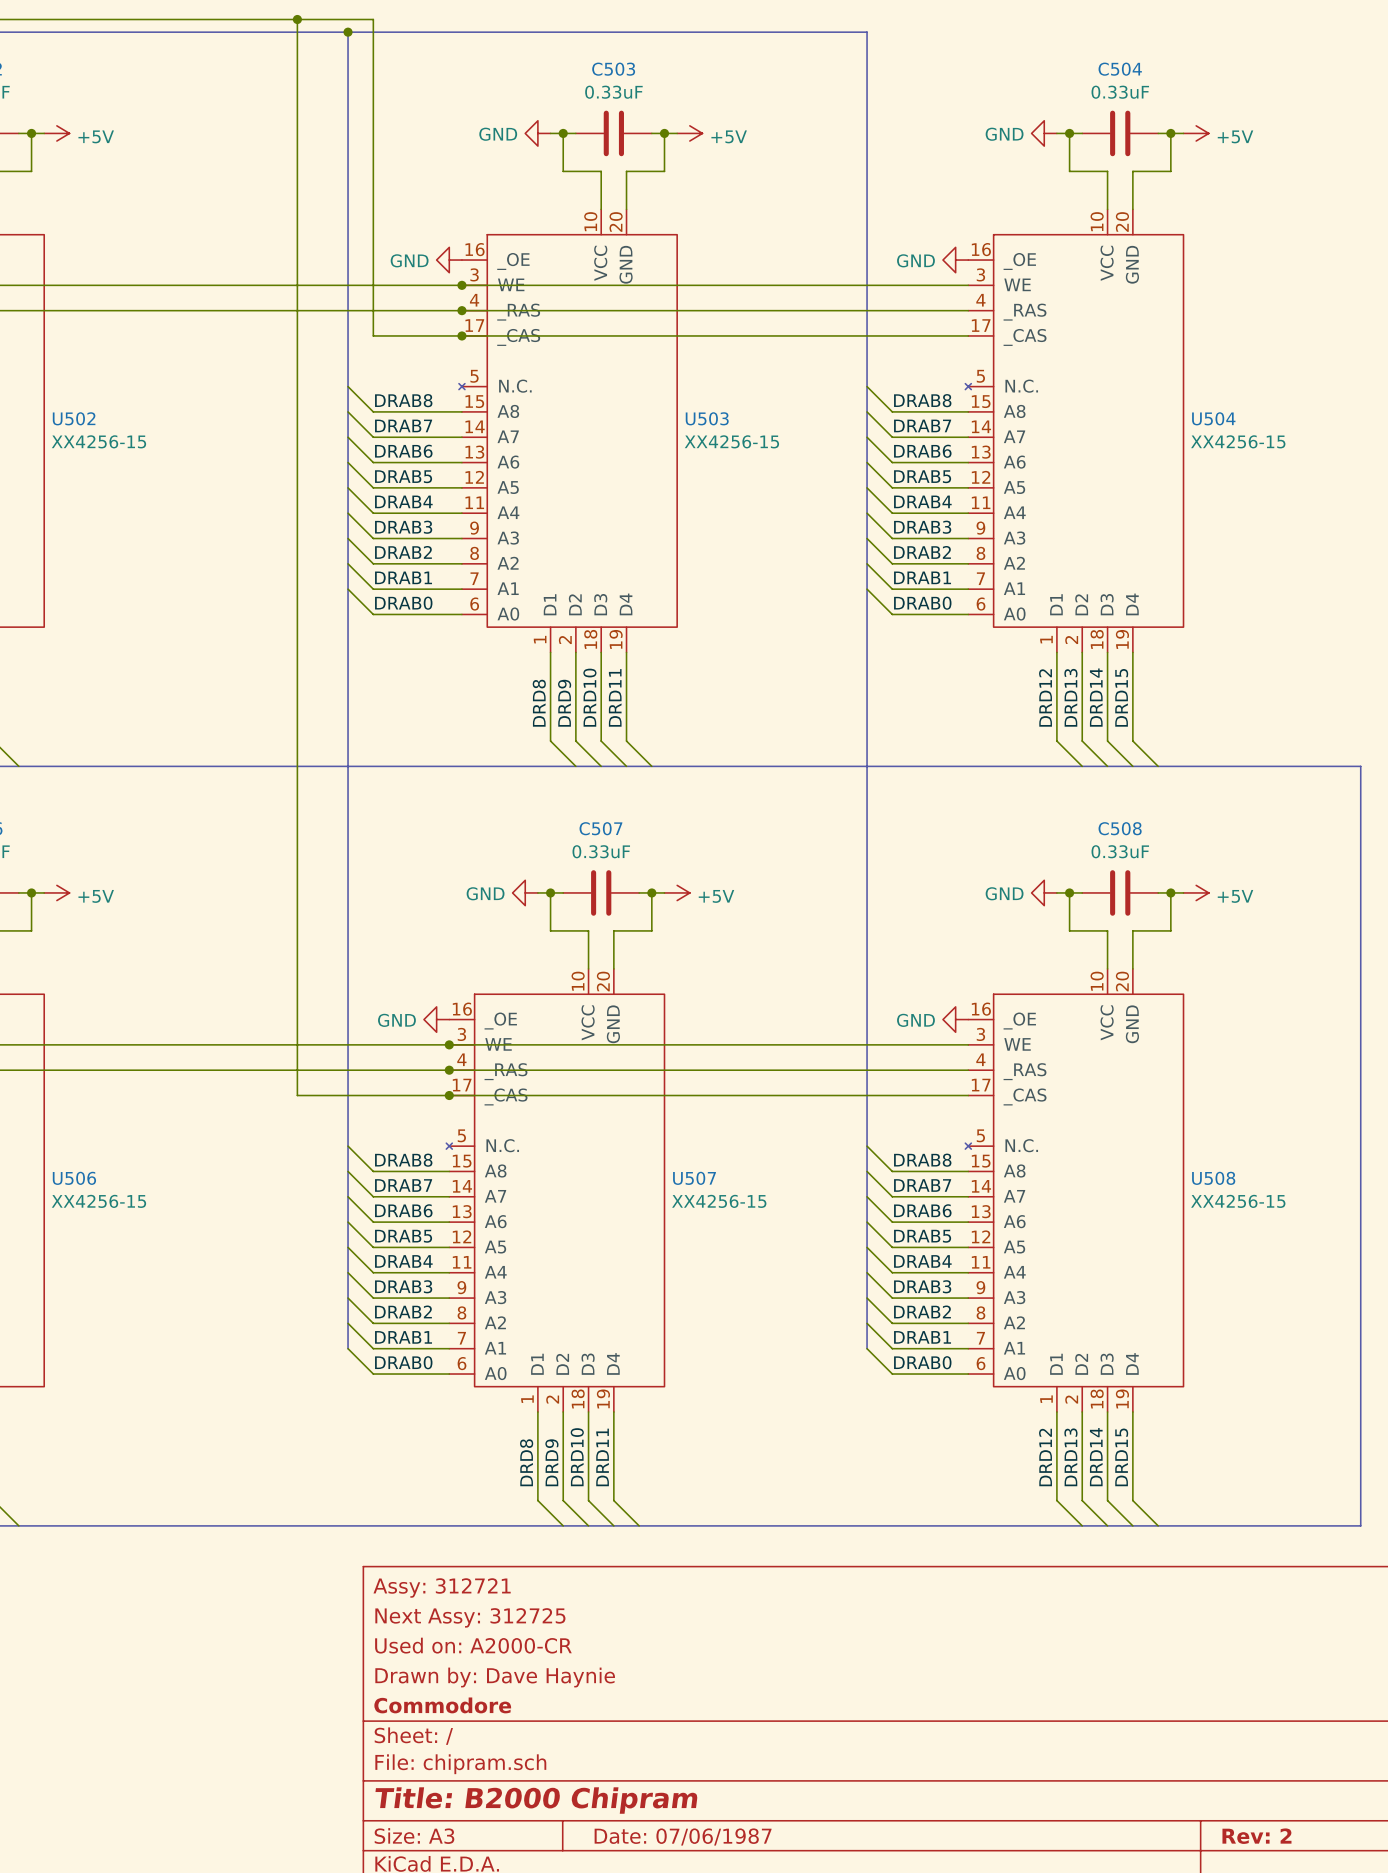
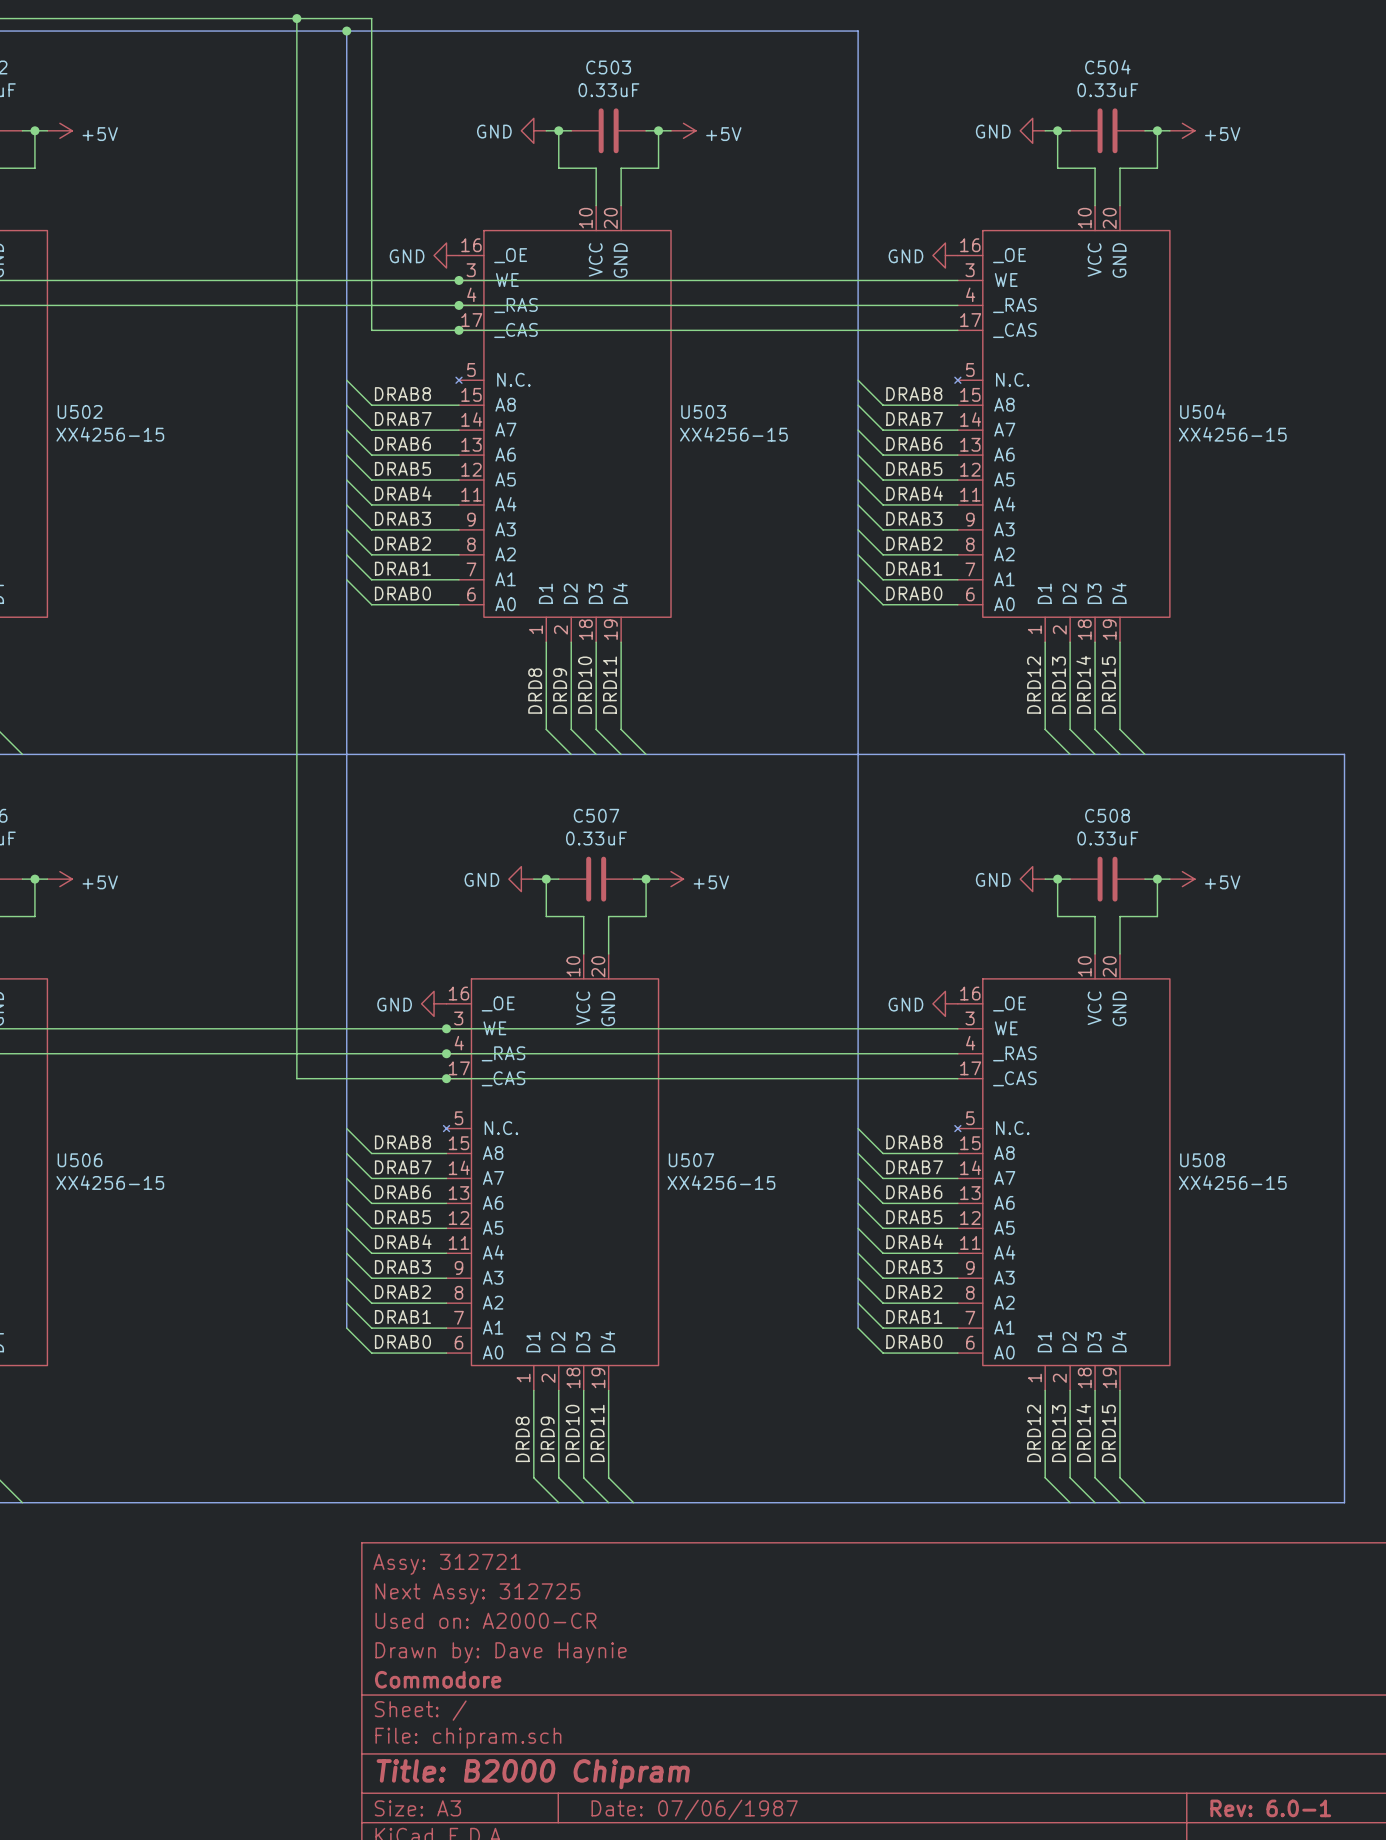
title block: Rev: 2 (1256, 1836) -> Rev: 6.0-1 (1270, 1808)

